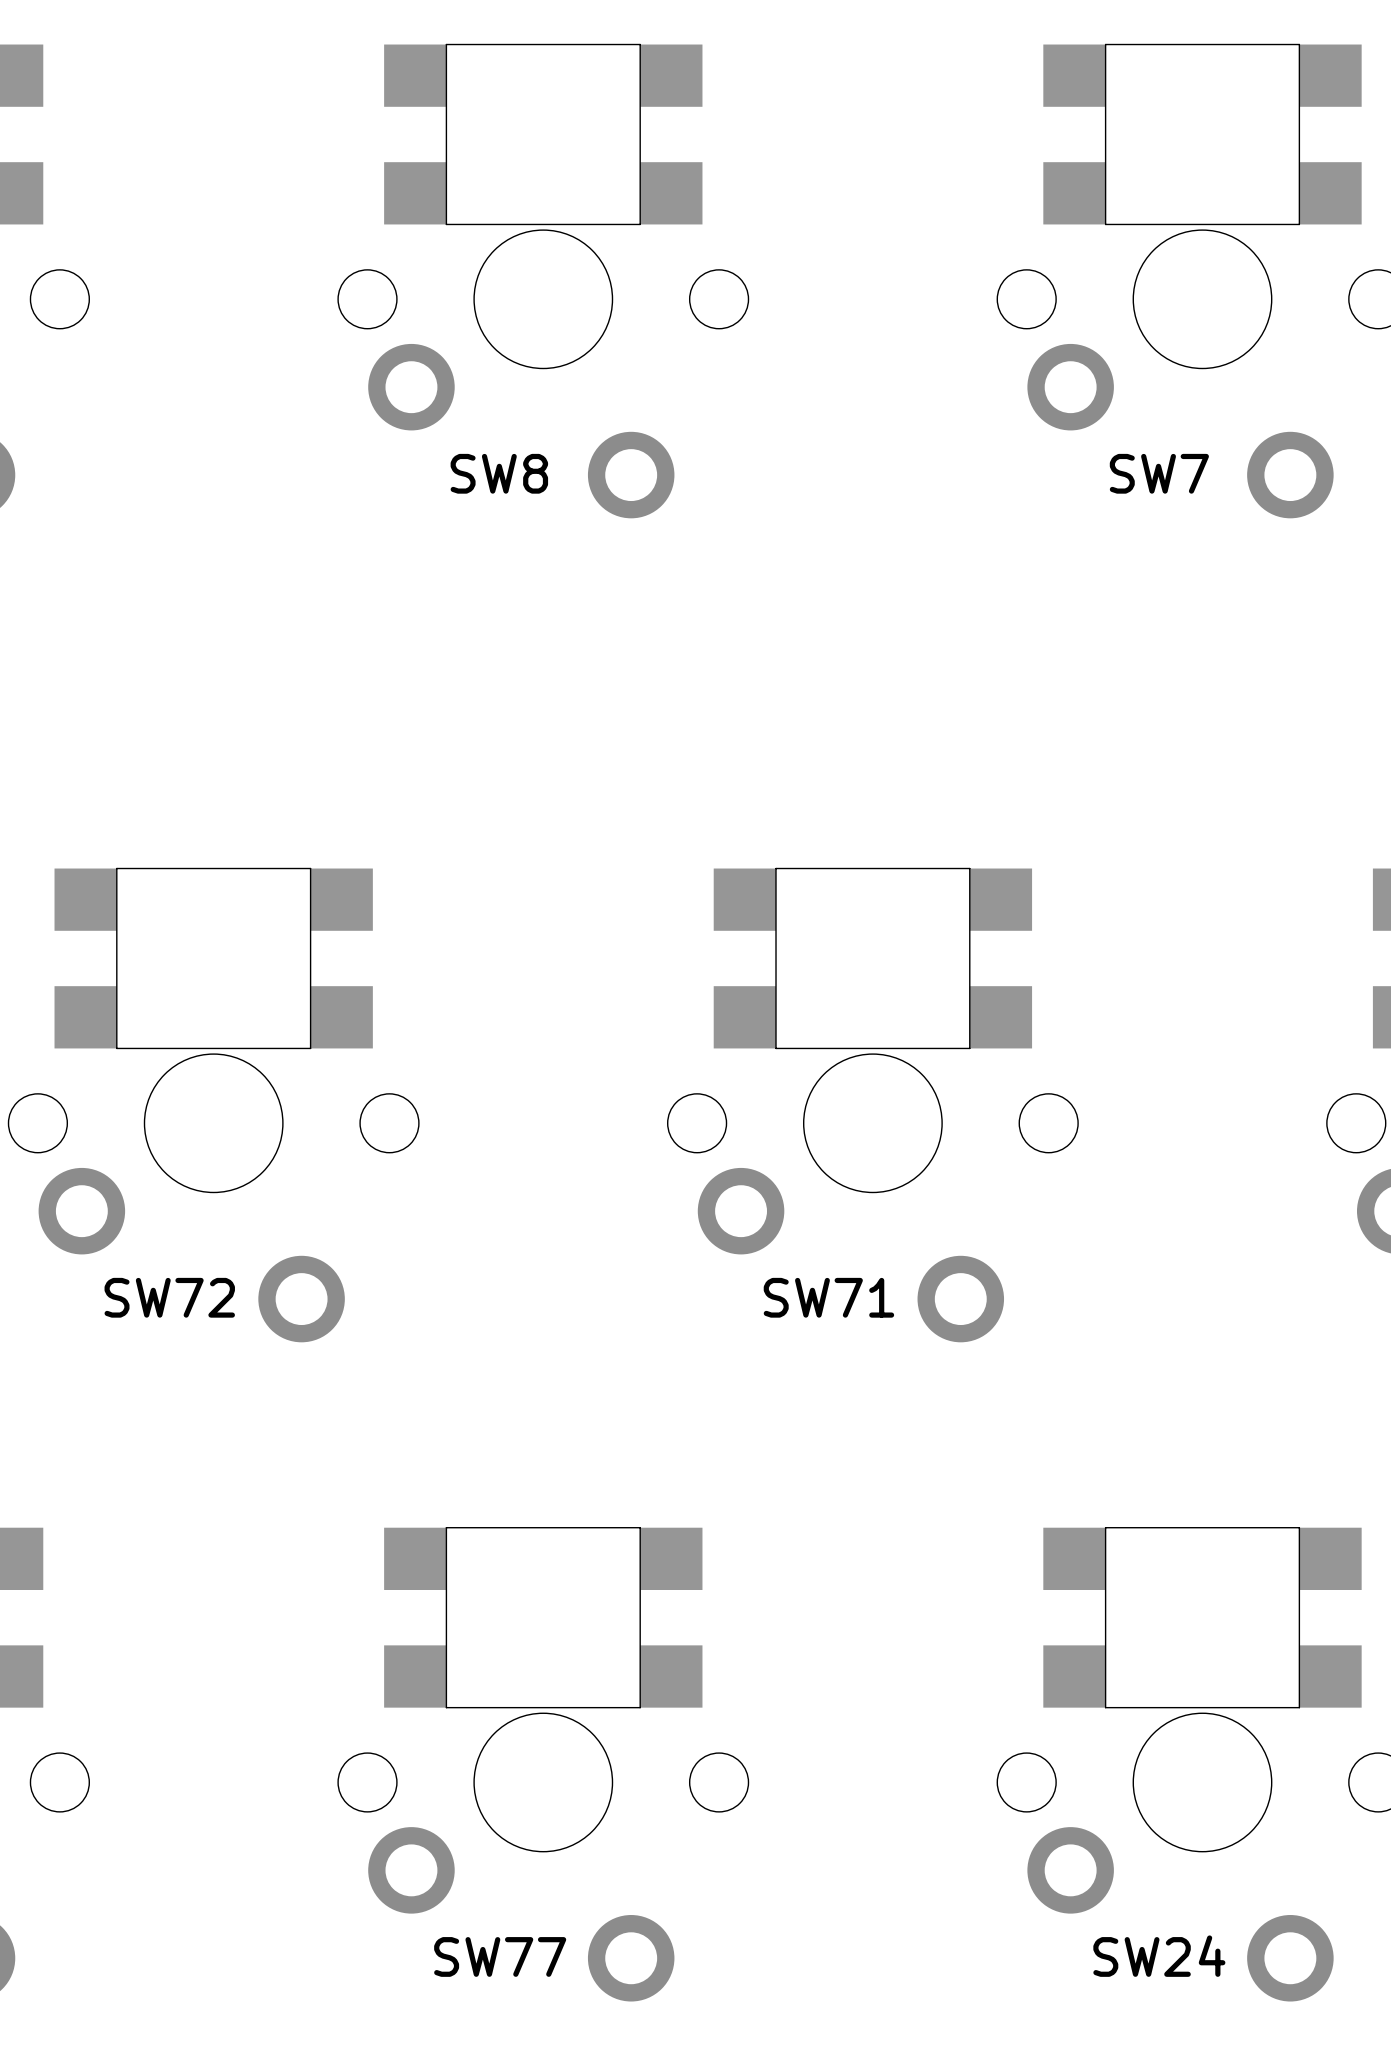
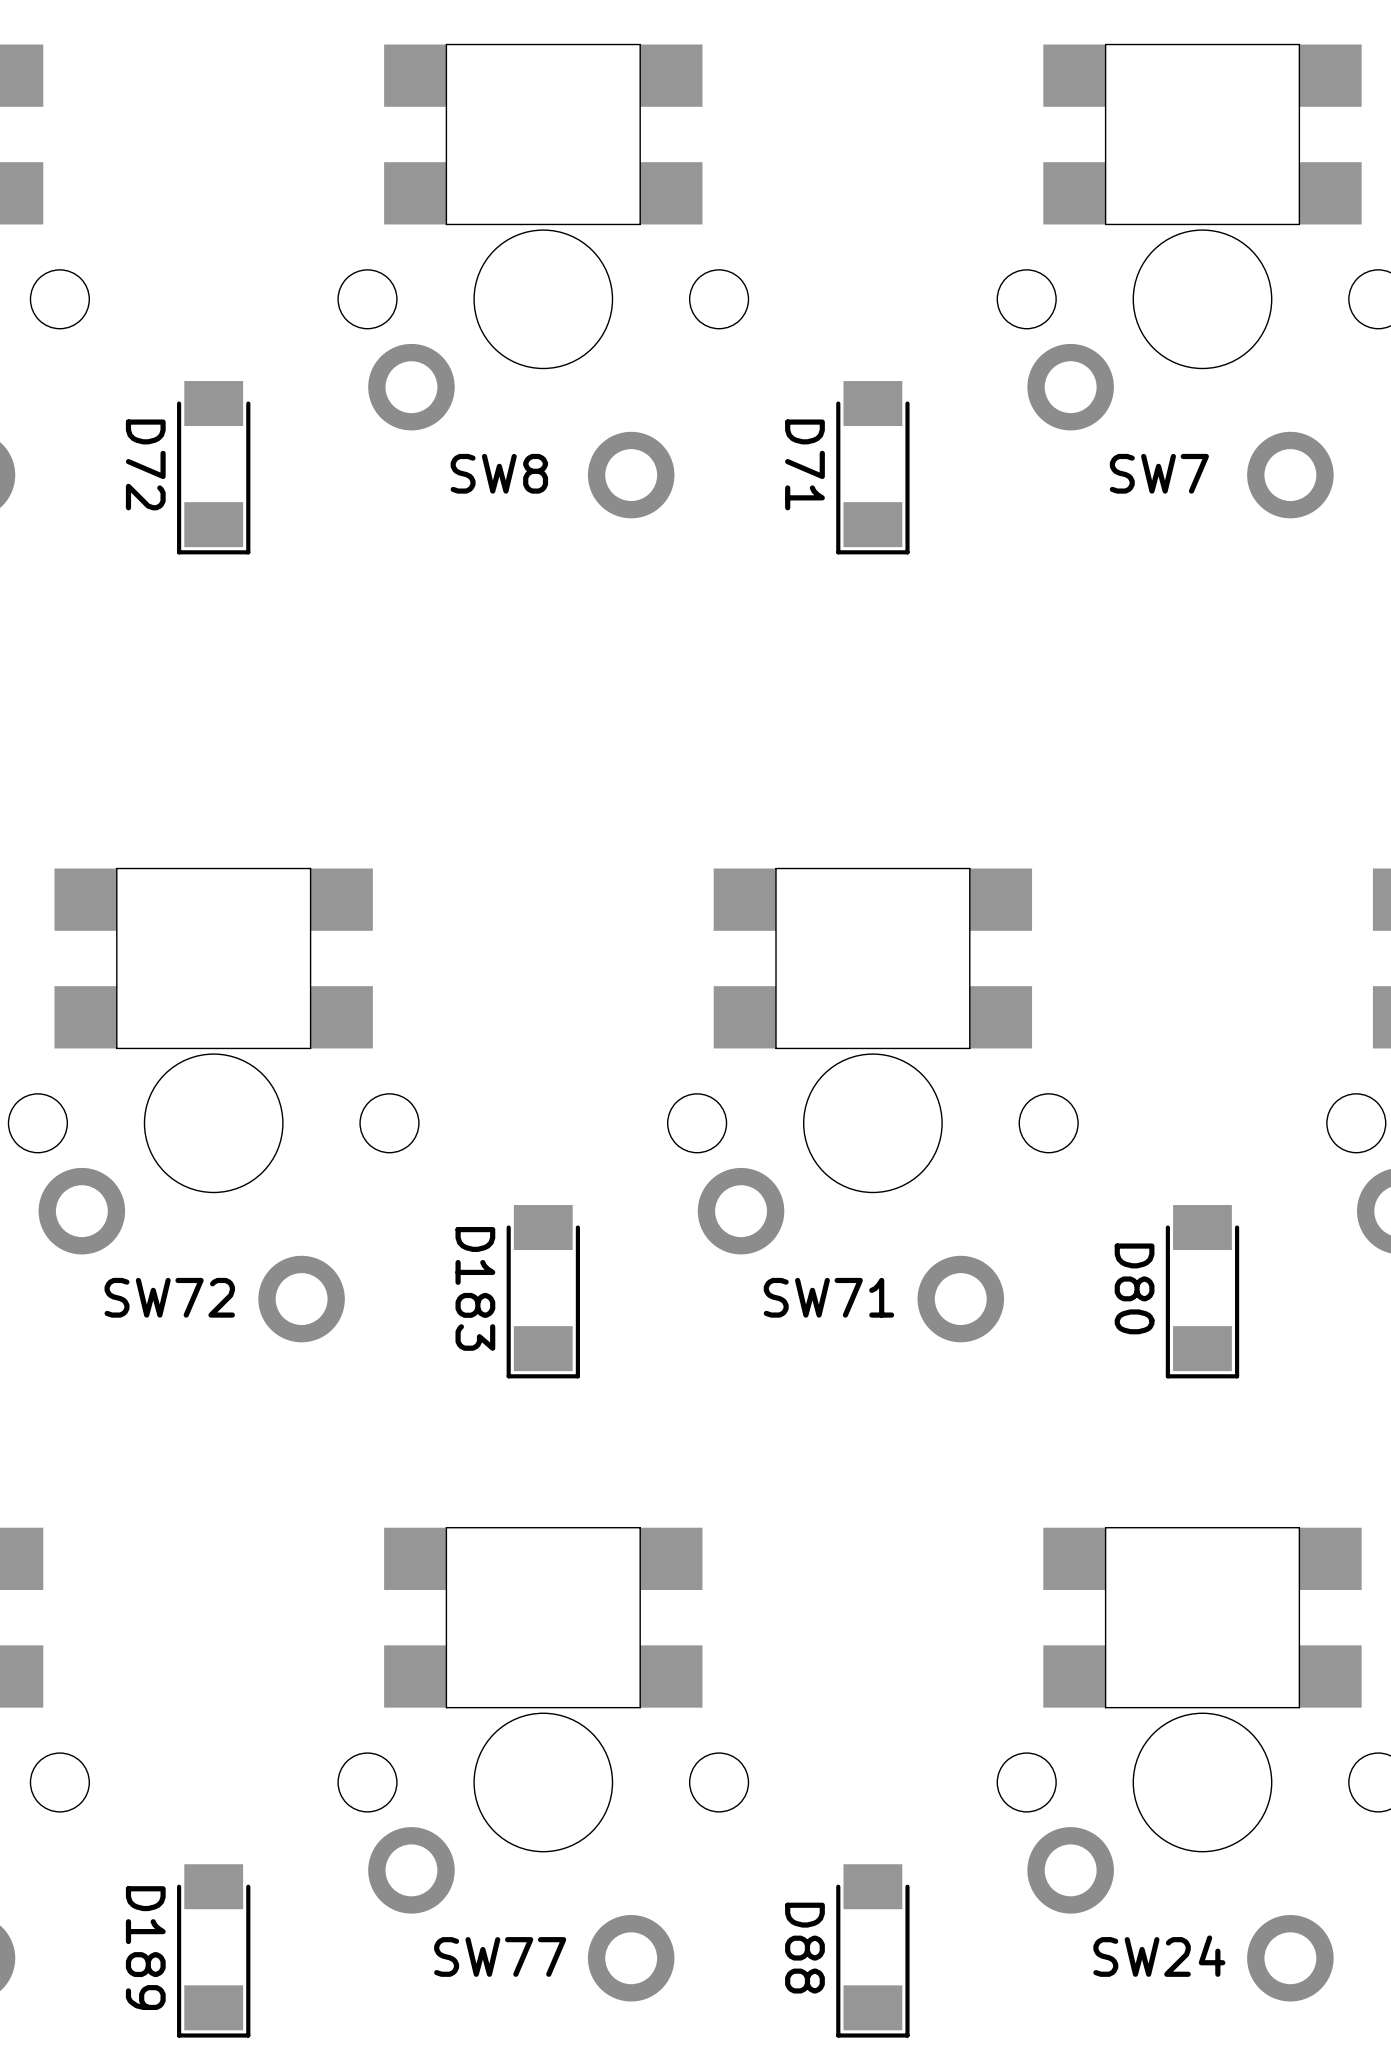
D72: none -> (213, 467)
D71: none -> (872, 467)
D183: none -> (543, 1291)
D80: none -> (1202, 1291)
D189: none -> (213, 1950)
D88: none -> (872, 1950)

